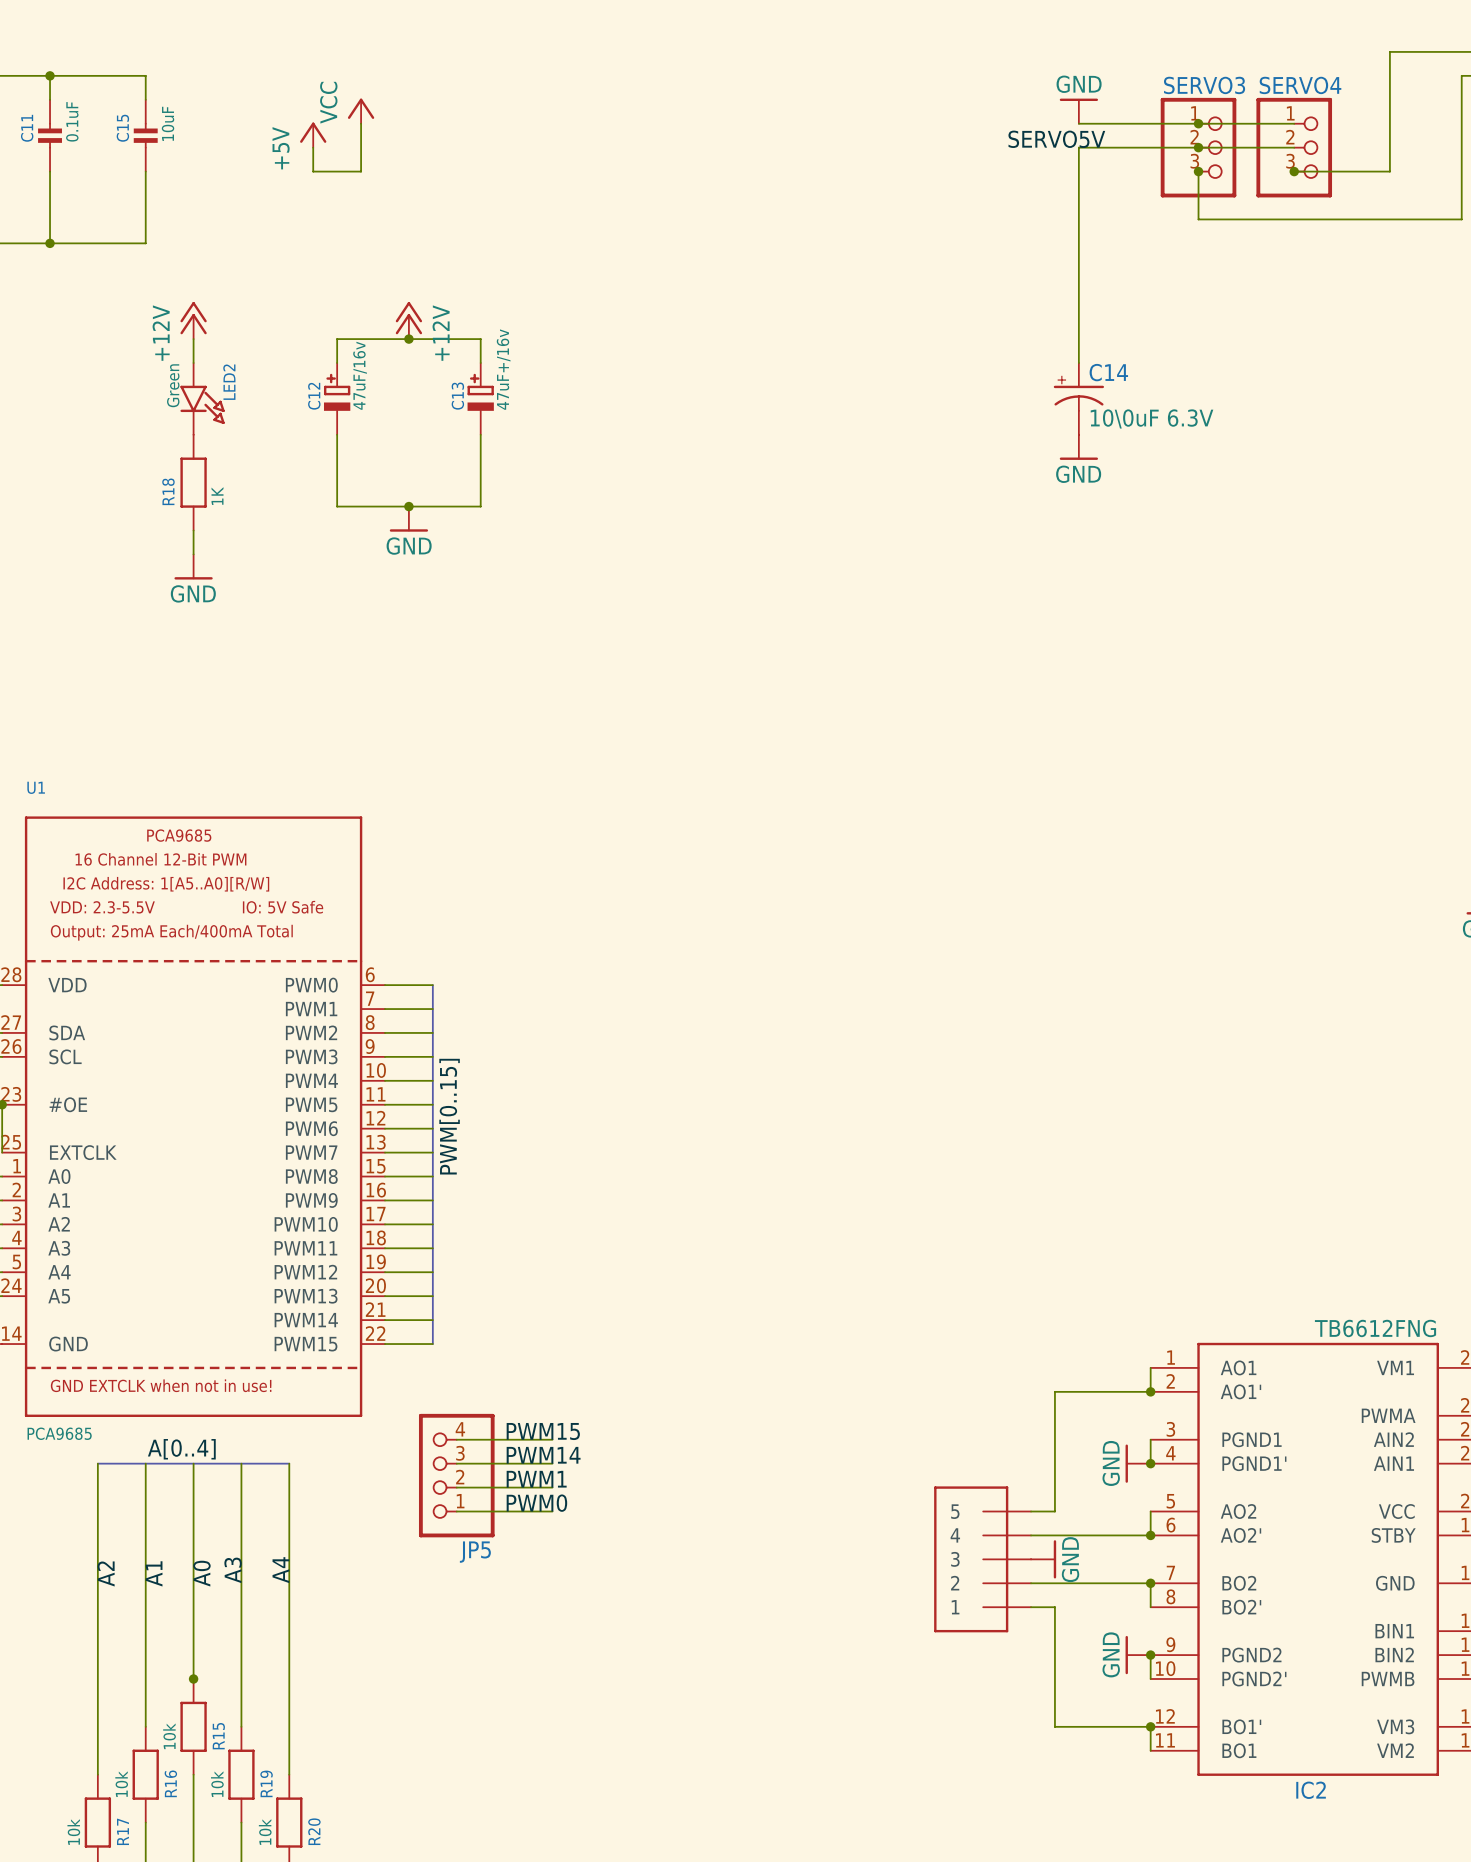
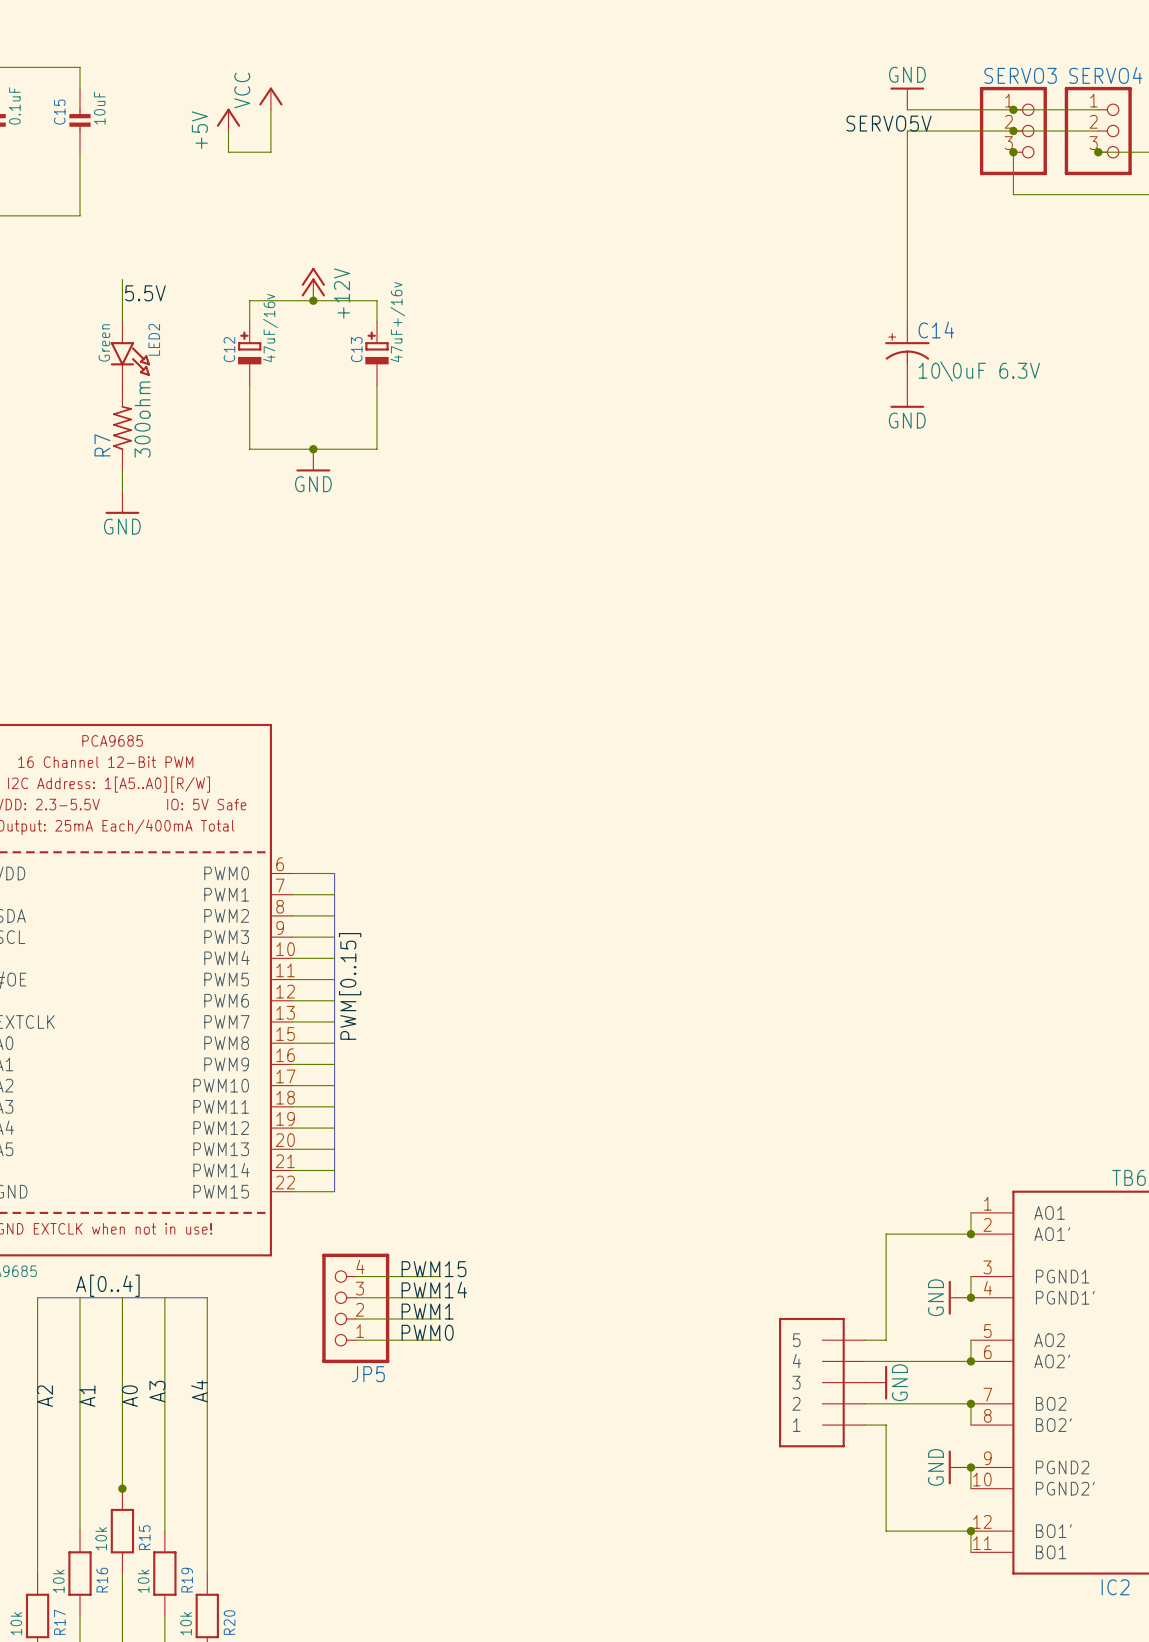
power symbol: +12V (193, 320) -> none
label: none -> 5.5V (145, 293)
R18: 1K (193, 482) -> none
R7: none -> 300ohm (122, 428)

